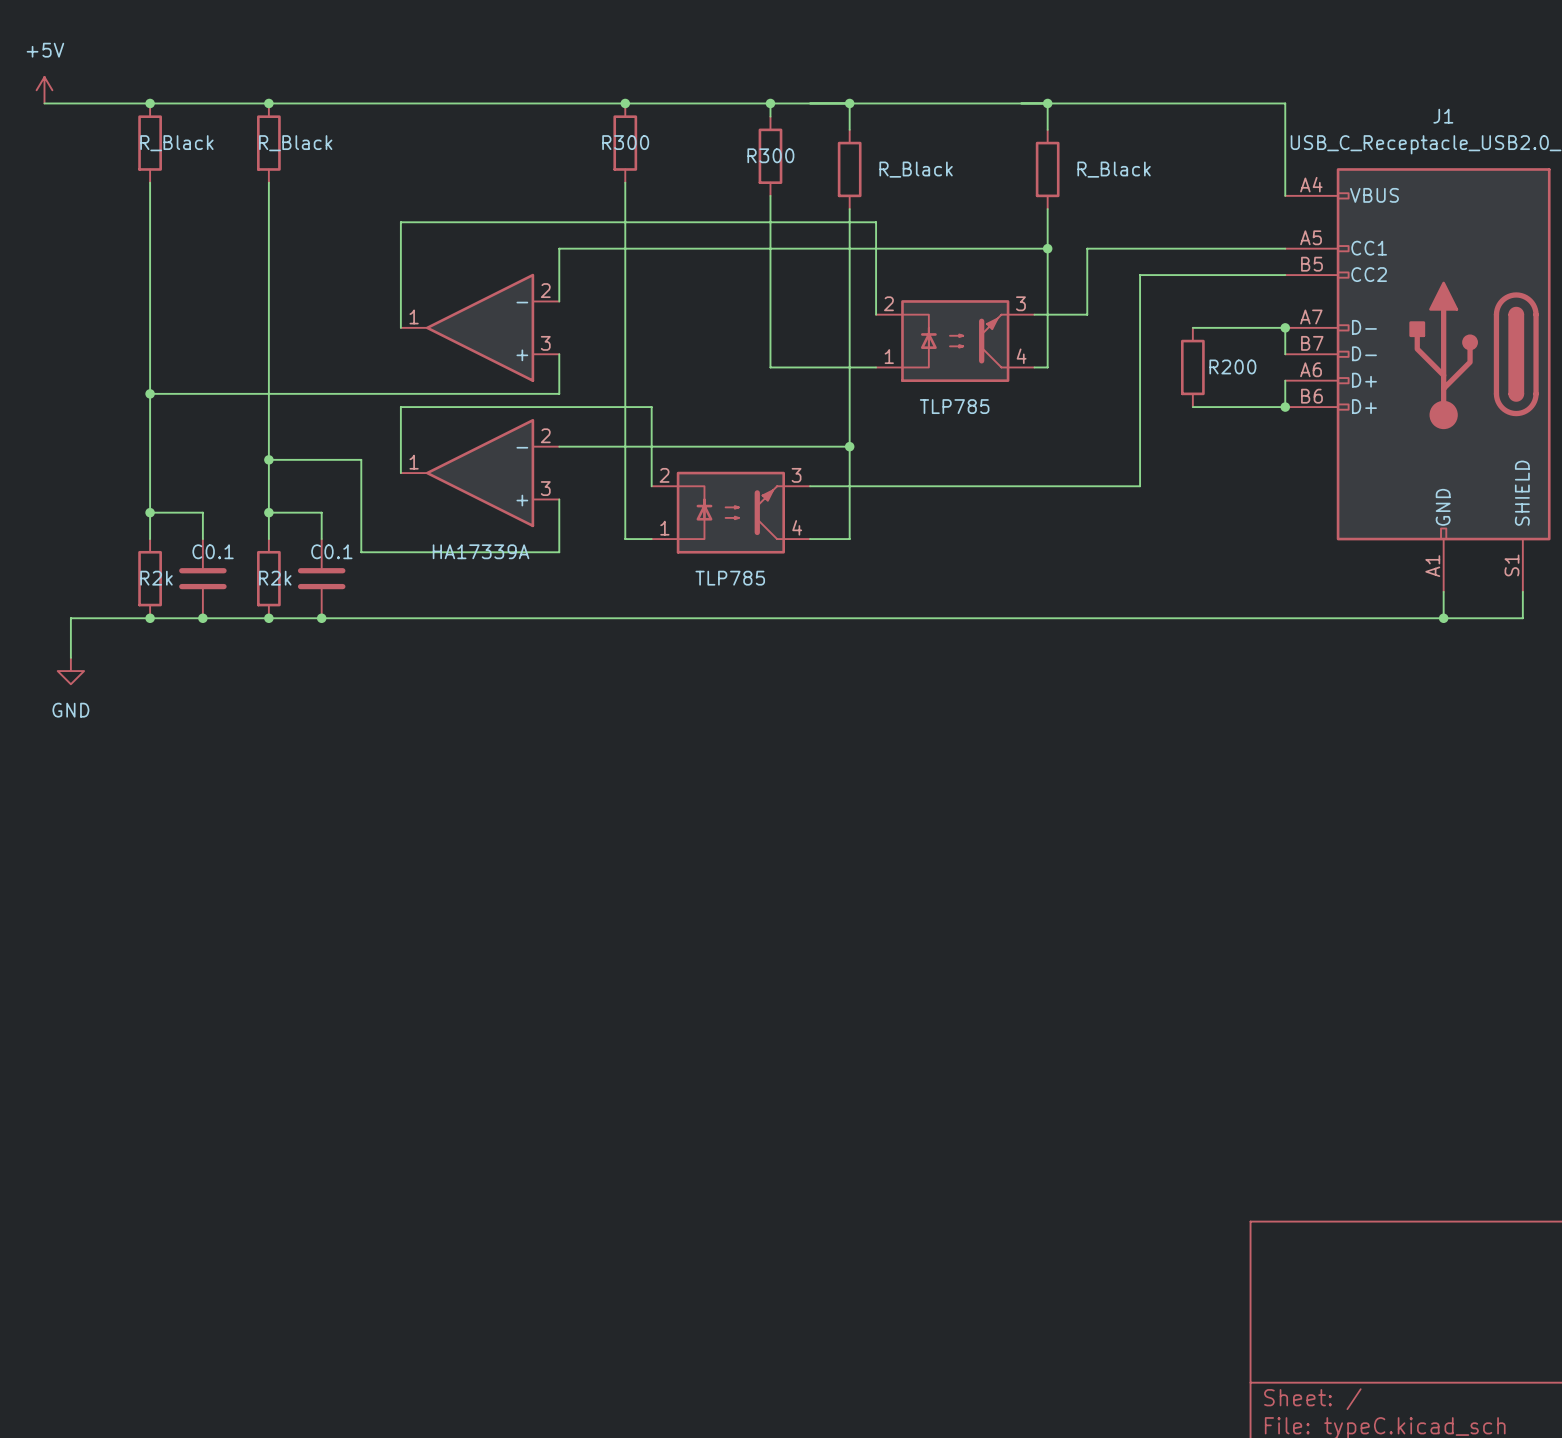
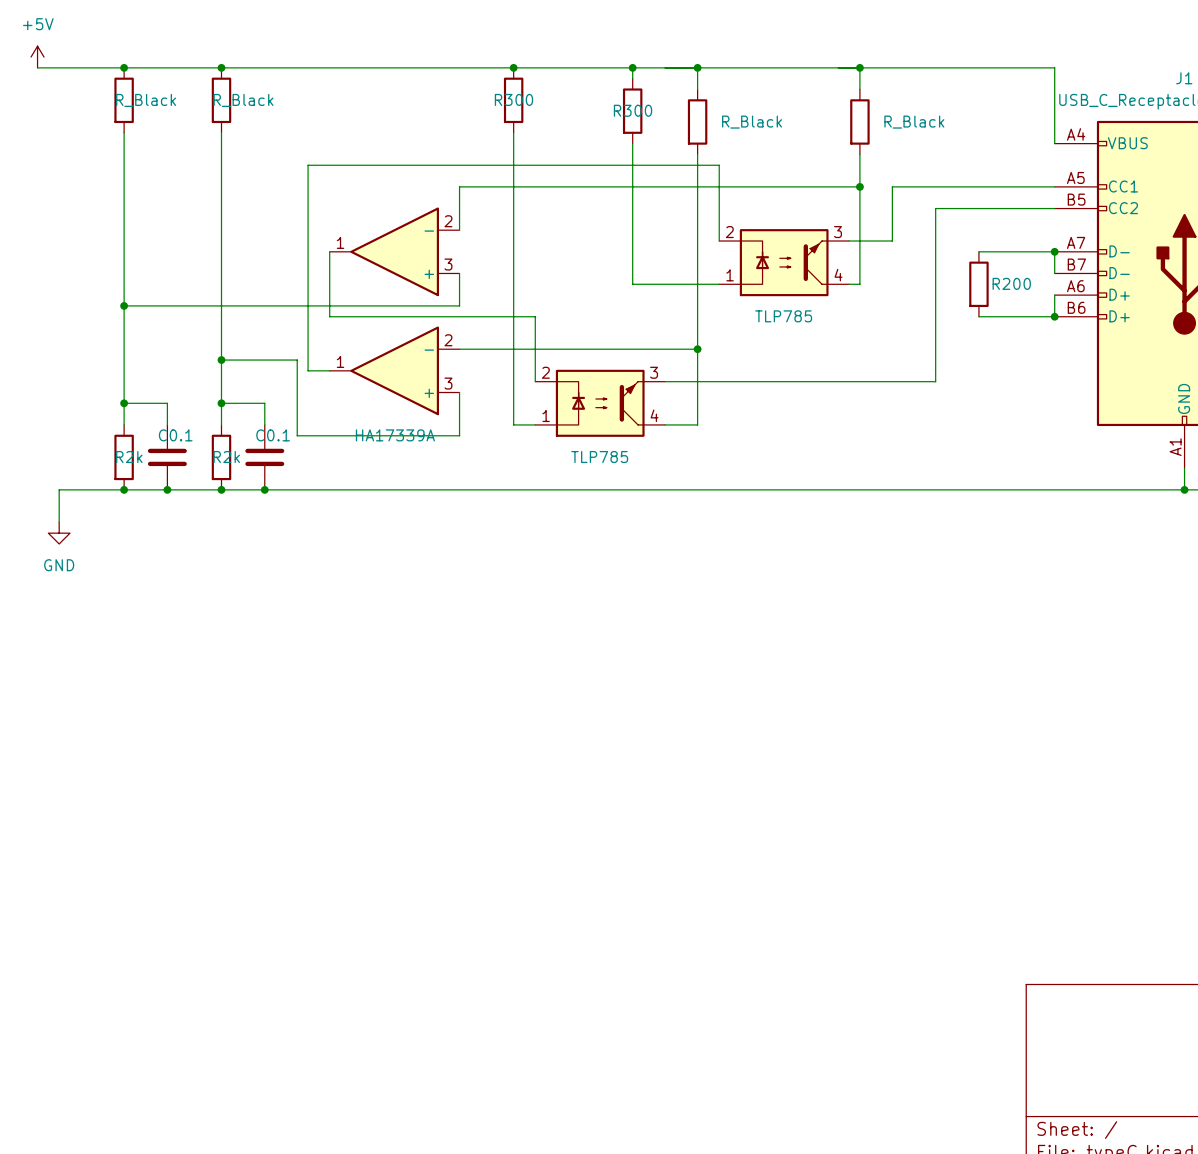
wire: (400, 222) (400, 327) -> (329, 165) (308, 165) (308, 370) (329, 370)
wire: (400, 407) (400, 473) -> (329, 316) (329, 251)

